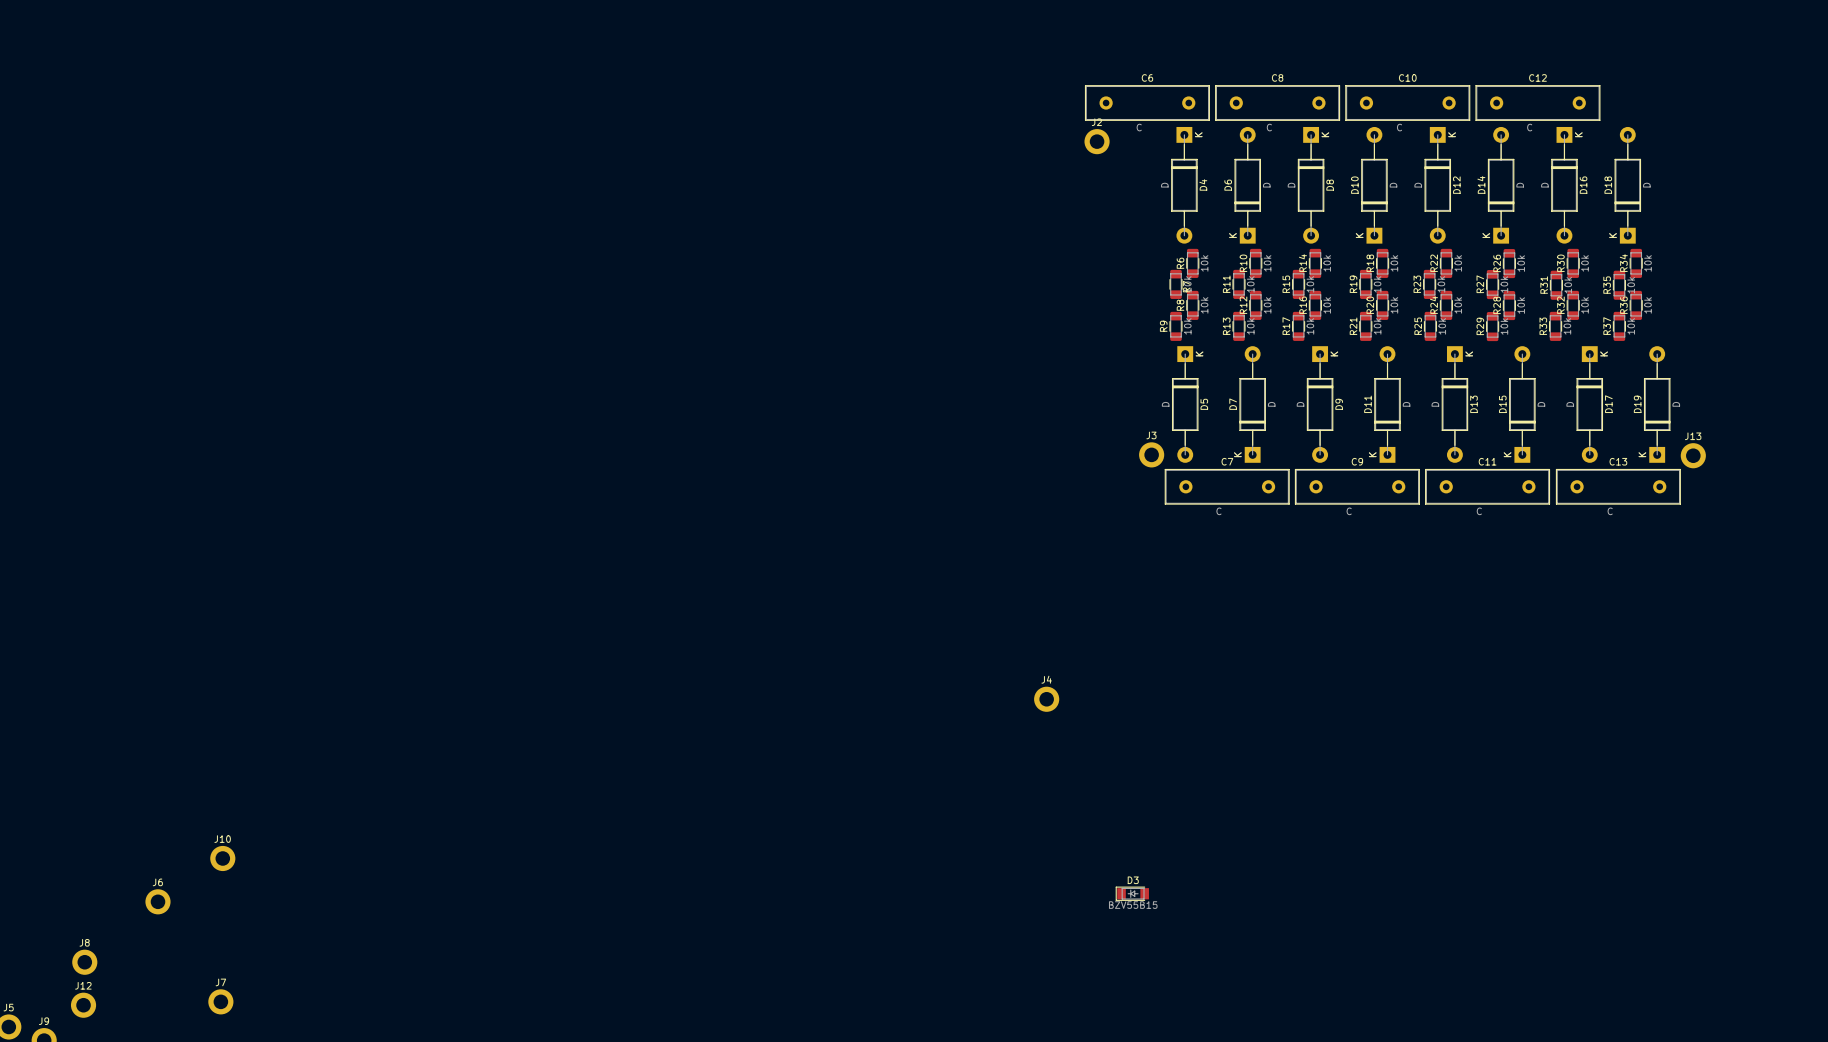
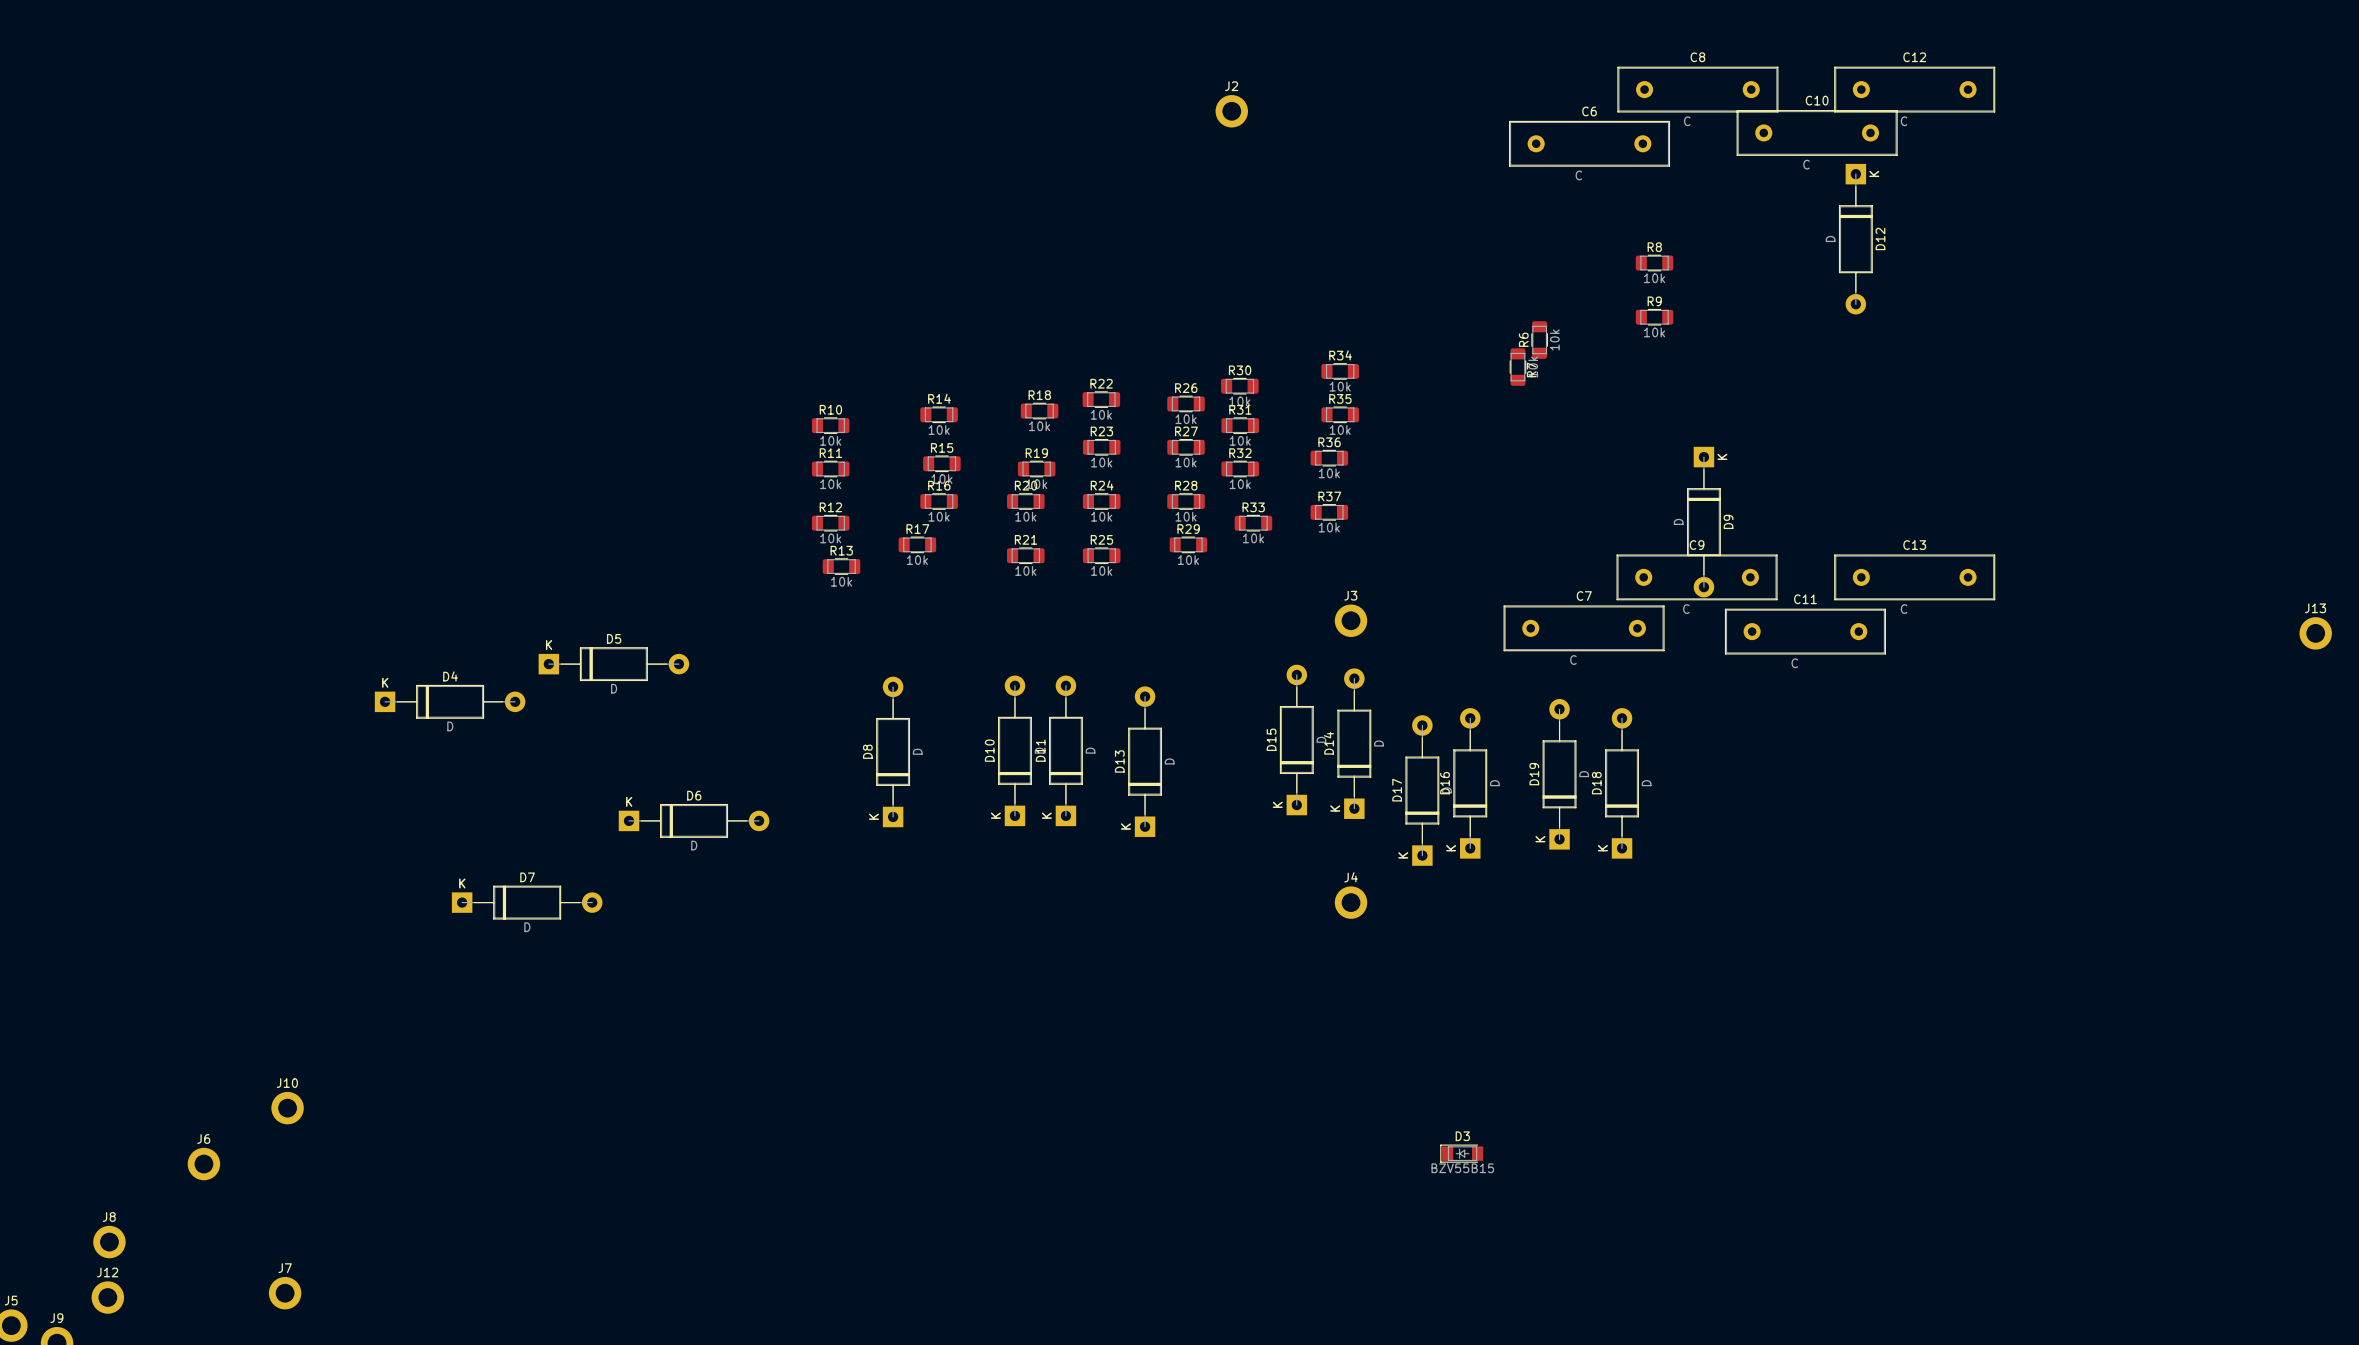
C6 position: (1147, 103) -> (1589, 143)
C8 position: (1277, 103) -> (1697, 89)
C12 position: (1537, 103) -> (1914, 89)
J2 position: (1097, 141) -> (1231, 111)
D4 rotation: 0° (1184, 185) -> 90° counterclockwise (450, 701)
D4 position: (1184, 185) -> (450, 701)
D6 rotation: 0° (1247, 185) -> 90° clockwise (694, 820)
D6 position: (1247, 185) -> (694, 820)
D8 rotation: 0° (1311, 185) -> 180° (893, 751)
D8 position: (1311, 185) -> (893, 751)
D10 position: (1374, 185) -> (1014, 750)
D14 position: (1501, 185) -> (1354, 743)
D16 rotation: 0° (1564, 185) -> 180° (1470, 783)
D16 position: (1564, 185) -> (1470, 783)
D18 position: (1627, 185) -> (1622, 783)
R10 rotation: 0° (1255, 263) -> 90° clockwise (830, 425)
R10 position: (1255, 263) -> (830, 425)
R14 rotation: 0° (1315, 263) -> 90° clockwise (939, 414)
R14 position: (1315, 263) -> (939, 414)
R18 rotation: 0° (1382, 263) -> 90° clockwise (1039, 411)
R18 position: (1382, 263) -> (1039, 411)
R22 rotation: 0° (1446, 263) -> 90° clockwise (1101, 399)
R22 position: (1446, 263) -> (1101, 399)
R26 rotation: 0° (1509, 263) -> 90° clockwise (1186, 403)
R26 position: (1509, 263) -> (1186, 403)
R30 rotation: 0° (1573, 263) -> 90° clockwise (1239, 386)
R30 position: (1573, 263) -> (1239, 386)
R34 rotation: 0° (1636, 263) -> 90° clockwise (1340, 371)
R34 position: (1636, 263) -> (1340, 371)
R11 rotation: 0° (1238, 284) -> 90° clockwise (830, 468)
R11 position: (1238, 284) -> (830, 468)
R15 rotation: 0° (1298, 284) -> 90° clockwise (941, 463)
R15 position: (1298, 284) -> (941, 463)
R19 rotation: 0° (1365, 284) -> 90° clockwise (1036, 468)
R19 position: (1365, 284) -> (1036, 468)
R23 rotation: 0° (1429, 284) -> 90° clockwise (1101, 447)
R23 position: (1429, 284) -> (1101, 447)
R27 rotation: 0° (1492, 284) -> 90° clockwise (1186, 447)
R27 position: (1492, 284) -> (1186, 447)
R31 rotation: 0° (1556, 285) -> 90° clockwise (1240, 425)
R31 position: (1556, 285) -> (1240, 425)
R35 rotation: 0° (1619, 285) -> 90° clockwise (1340, 414)
R35 position: (1619, 285) -> (1340, 414)
R8 rotation: 0° (1192, 305) -> 90° clockwise (1654, 263)
R8 position: (1192, 305) -> (1654, 263)
R12 rotation: 0° (1255, 305) -> 90° clockwise (830, 523)
R12 position: (1255, 305) -> (830, 523)
R16 rotation: 0° (1315, 305) -> 90° clockwise (939, 501)
R16 position: (1315, 305) -> (939, 501)
R20 rotation: 0° (1382, 305) -> 90° clockwise (1025, 501)
R20 position: (1382, 305) -> (1025, 501)
R24 rotation: 0° (1446, 305) -> 90° clockwise (1101, 501)
R24 position: (1446, 305) -> (1101, 501)
R28 rotation: 0° (1509, 305) -> 90° clockwise (1186, 501)
R28 position: (1509, 305) -> (1186, 501)
R32 rotation: 0° (1573, 305) -> 90° clockwise (1240, 468)
R32 position: (1573, 305) -> (1240, 468)
R36 rotation: 0° (1636, 305) -> 90° clockwise (1329, 458)
R36 position: (1636, 305) -> (1329, 458)
R9 rotation: 0° (1175, 326) -> 90° clockwise (1654, 317)
R9 position: (1175, 326) -> (1654, 317)
R13 rotation: 0° (1238, 326) -> 90° clockwise (841, 566)
R13 position: (1238, 326) -> (841, 566)
R17 rotation: 0° (1298, 326) -> 90° clockwise (917, 544)
R17 position: (1298, 326) -> (917, 544)
R21 rotation: 0° (1365, 326) -> 90° clockwise (1025, 555)
R21 position: (1365, 326) -> (1025, 555)
R25 rotation: 0° (1430, 326) -> 90° clockwise (1101, 555)
R25 position: (1430, 326) -> (1101, 555)
R29 rotation: 0° (1492, 326) -> 90° clockwise (1188, 544)
R29 position: (1492, 326) -> (1188, 544)
R33 rotation: 0° (1555, 326) -> 90° clockwise (1253, 523)
R33 position: (1555, 326) -> (1253, 523)
R37 rotation: 0° (1619, 326) -> 90° clockwise (1329, 512)
R37 position: (1619, 326) -> (1329, 512)
D5 rotation: 0° (1185, 404) -> 90° counterclockwise (613, 664)
D5 position: (1185, 404) -> (613, 664)
D7 rotation: 0° (1252, 404) -> 90° clockwise (527, 902)
D7 position: (1252, 404) -> (527, 902)
D11 position: (1387, 404) -> (1065, 750)
D13 rotation: 0° (1454, 404) -> 180° (1145, 761)
D13 position: (1454, 404) -> (1145, 761)
D15 position: (1522, 404) -> (1296, 740)
D17 rotation: 0° (1589, 404) -> 180° (1422, 790)
D17 position: (1589, 404) -> (1422, 790)
D19 position: (1657, 404) -> (1559, 774)
J3 position: (1151, 454) -> (1351, 620)
J13 position: (1693, 455) -> (2315, 633)
C9 position: (1357, 486) -> (1697, 577)
C11 position: (1487, 486) -> (1805, 631)
C13 position: (1618, 486) -> (1914, 577)

